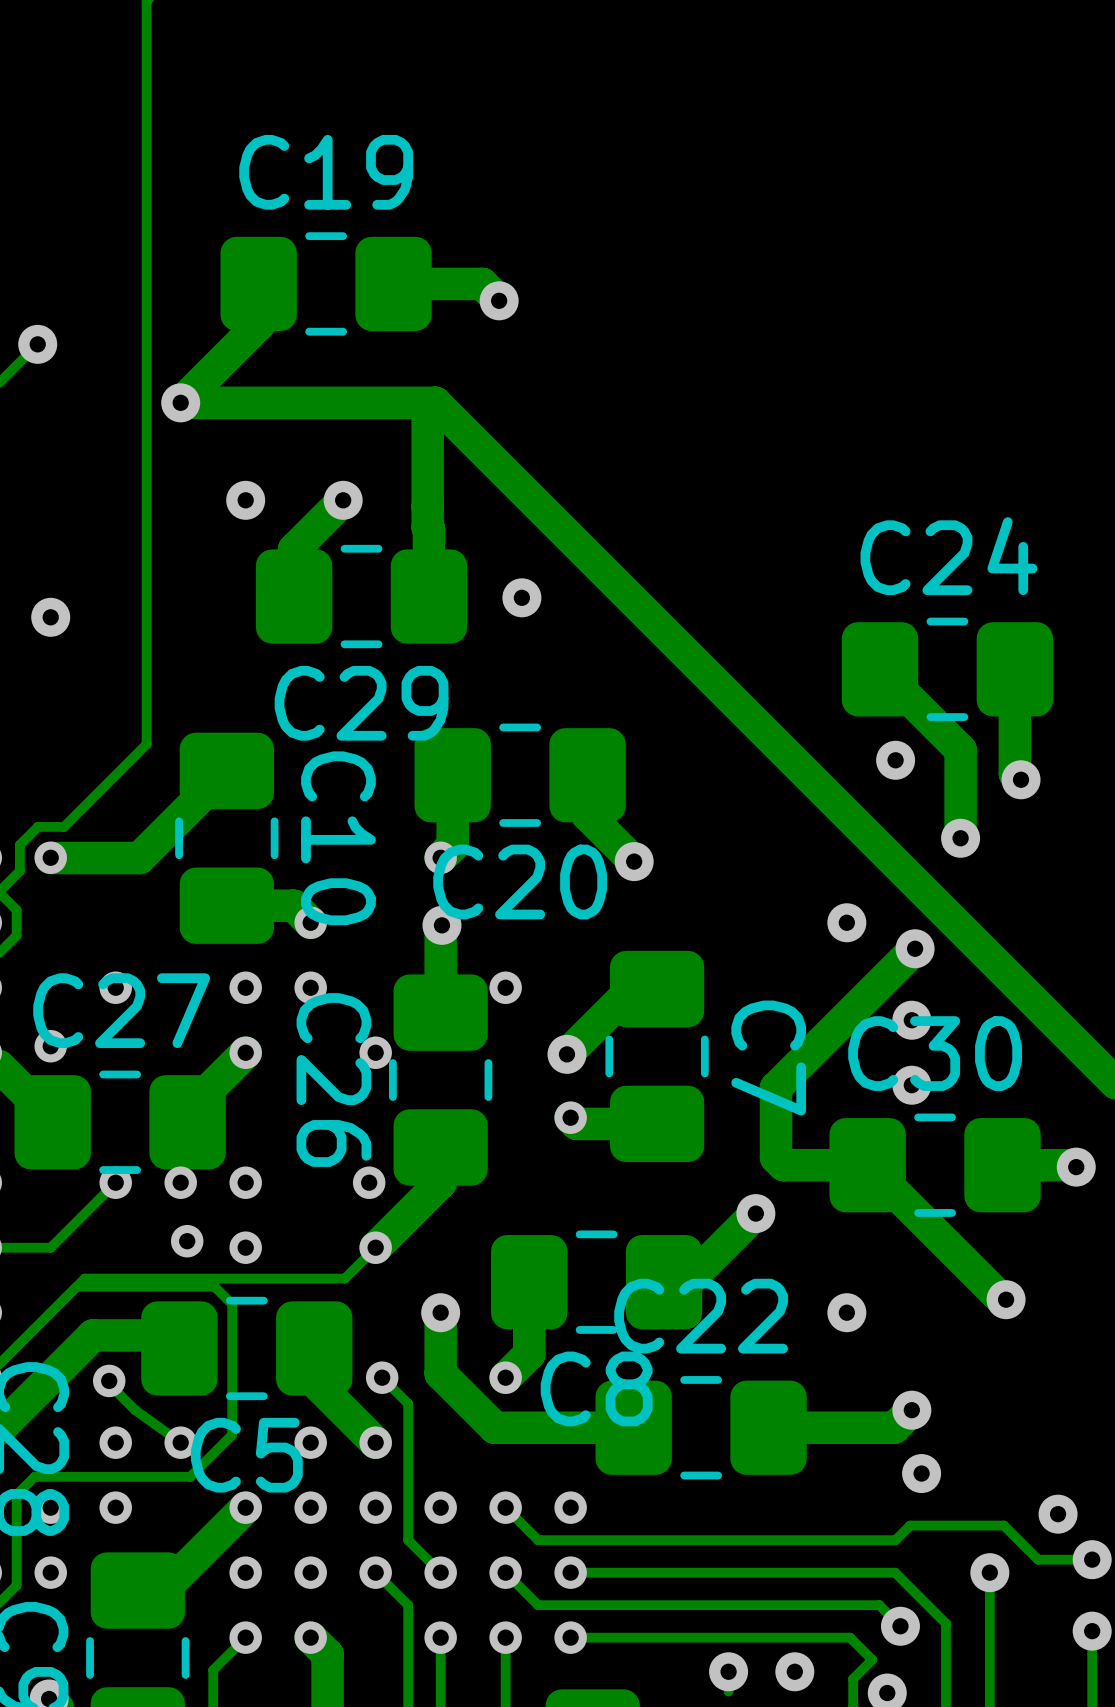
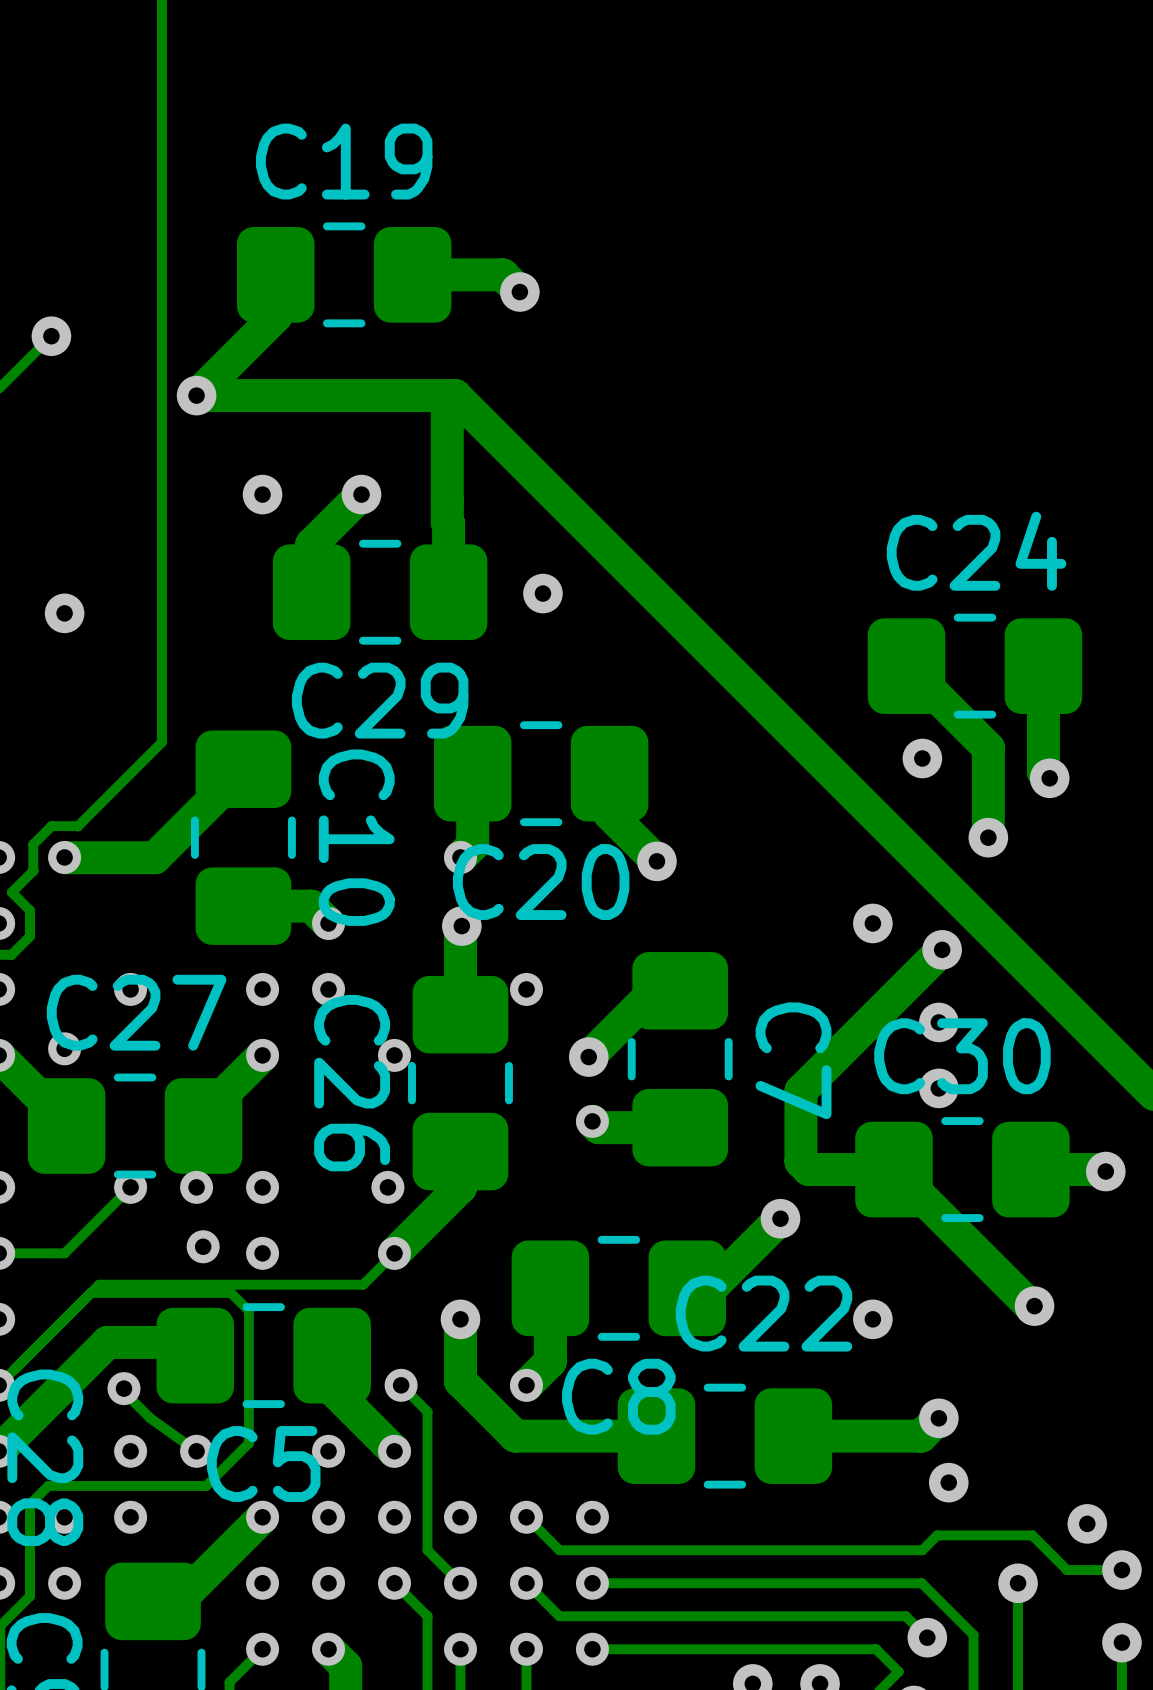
C22 name position: C22 (701, 1316) -> C22 (764, 1313)

